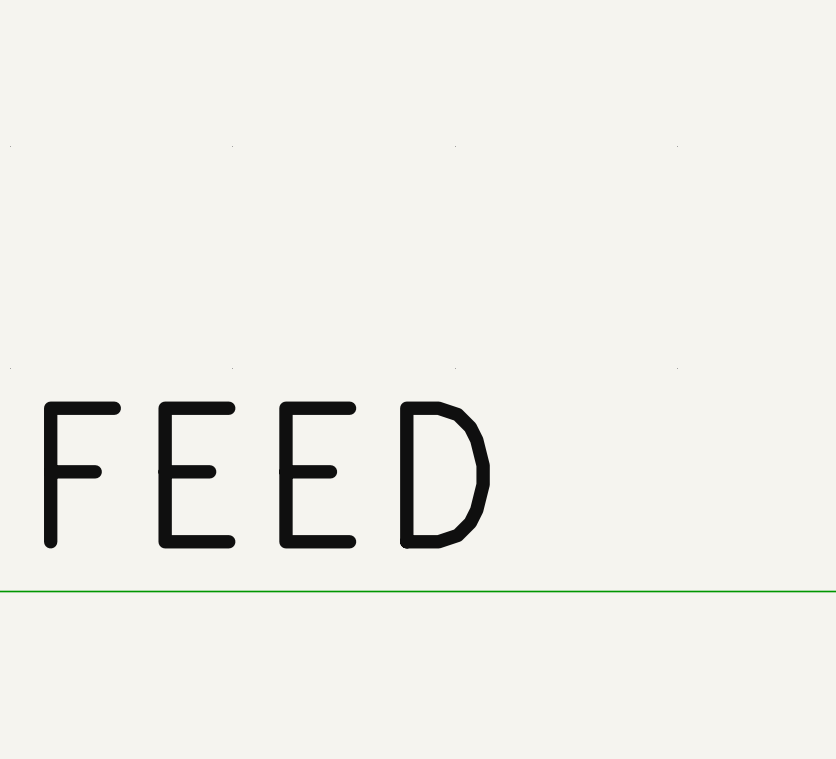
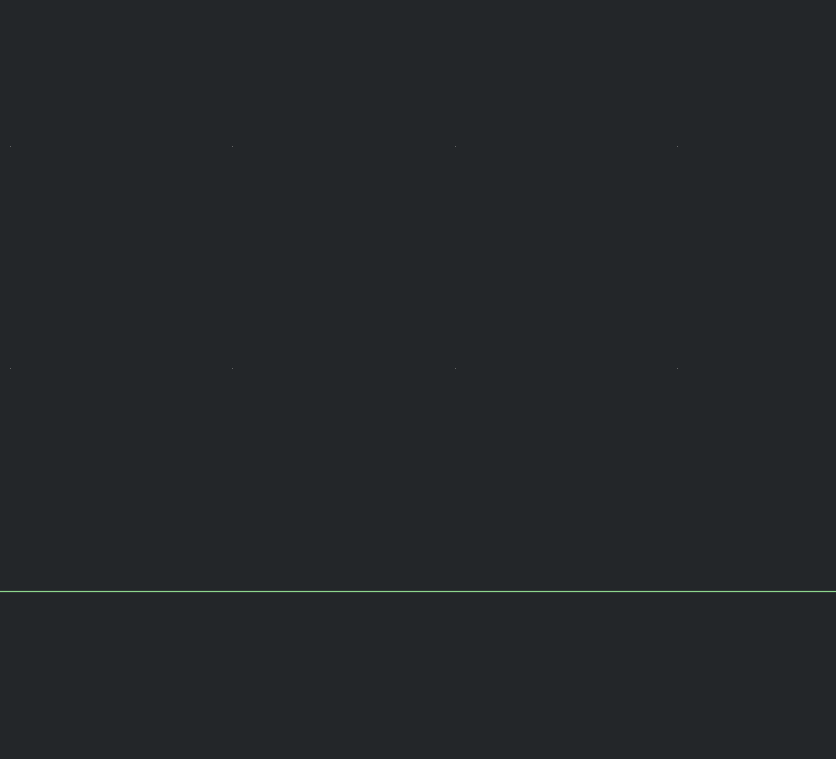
label: FEED (266, 475) -> none

